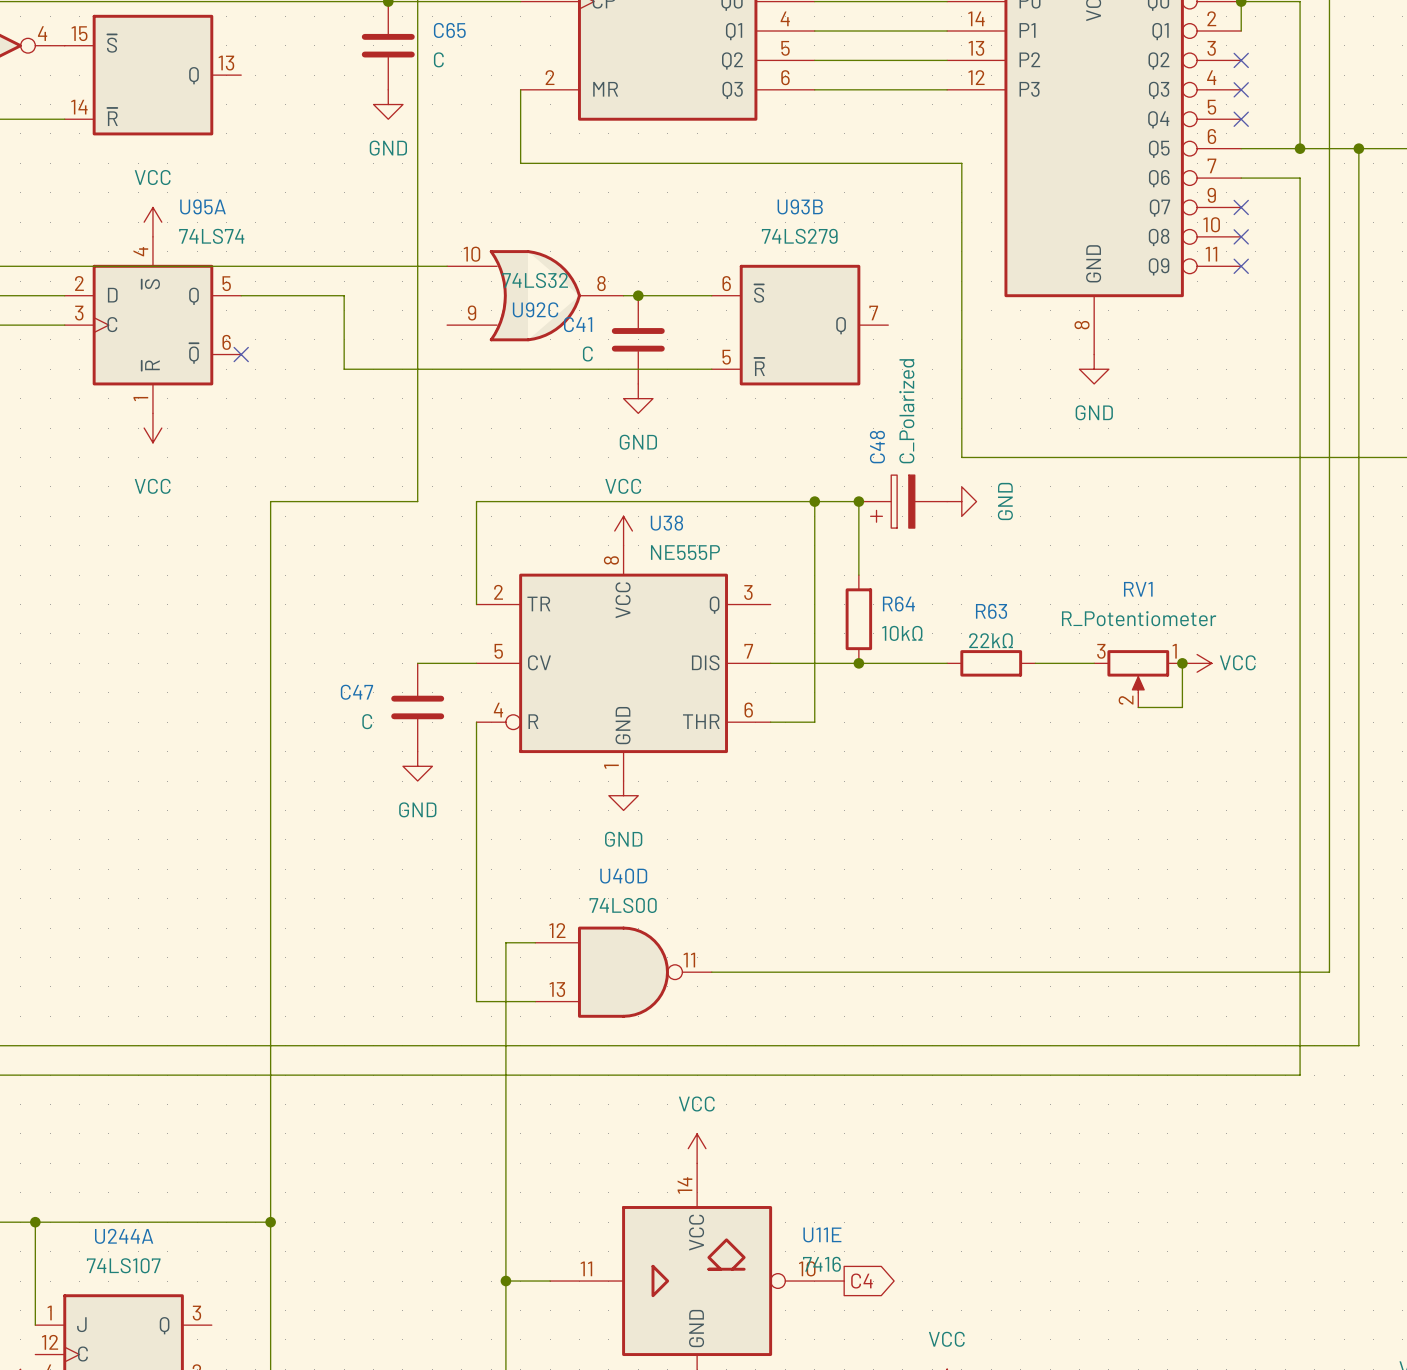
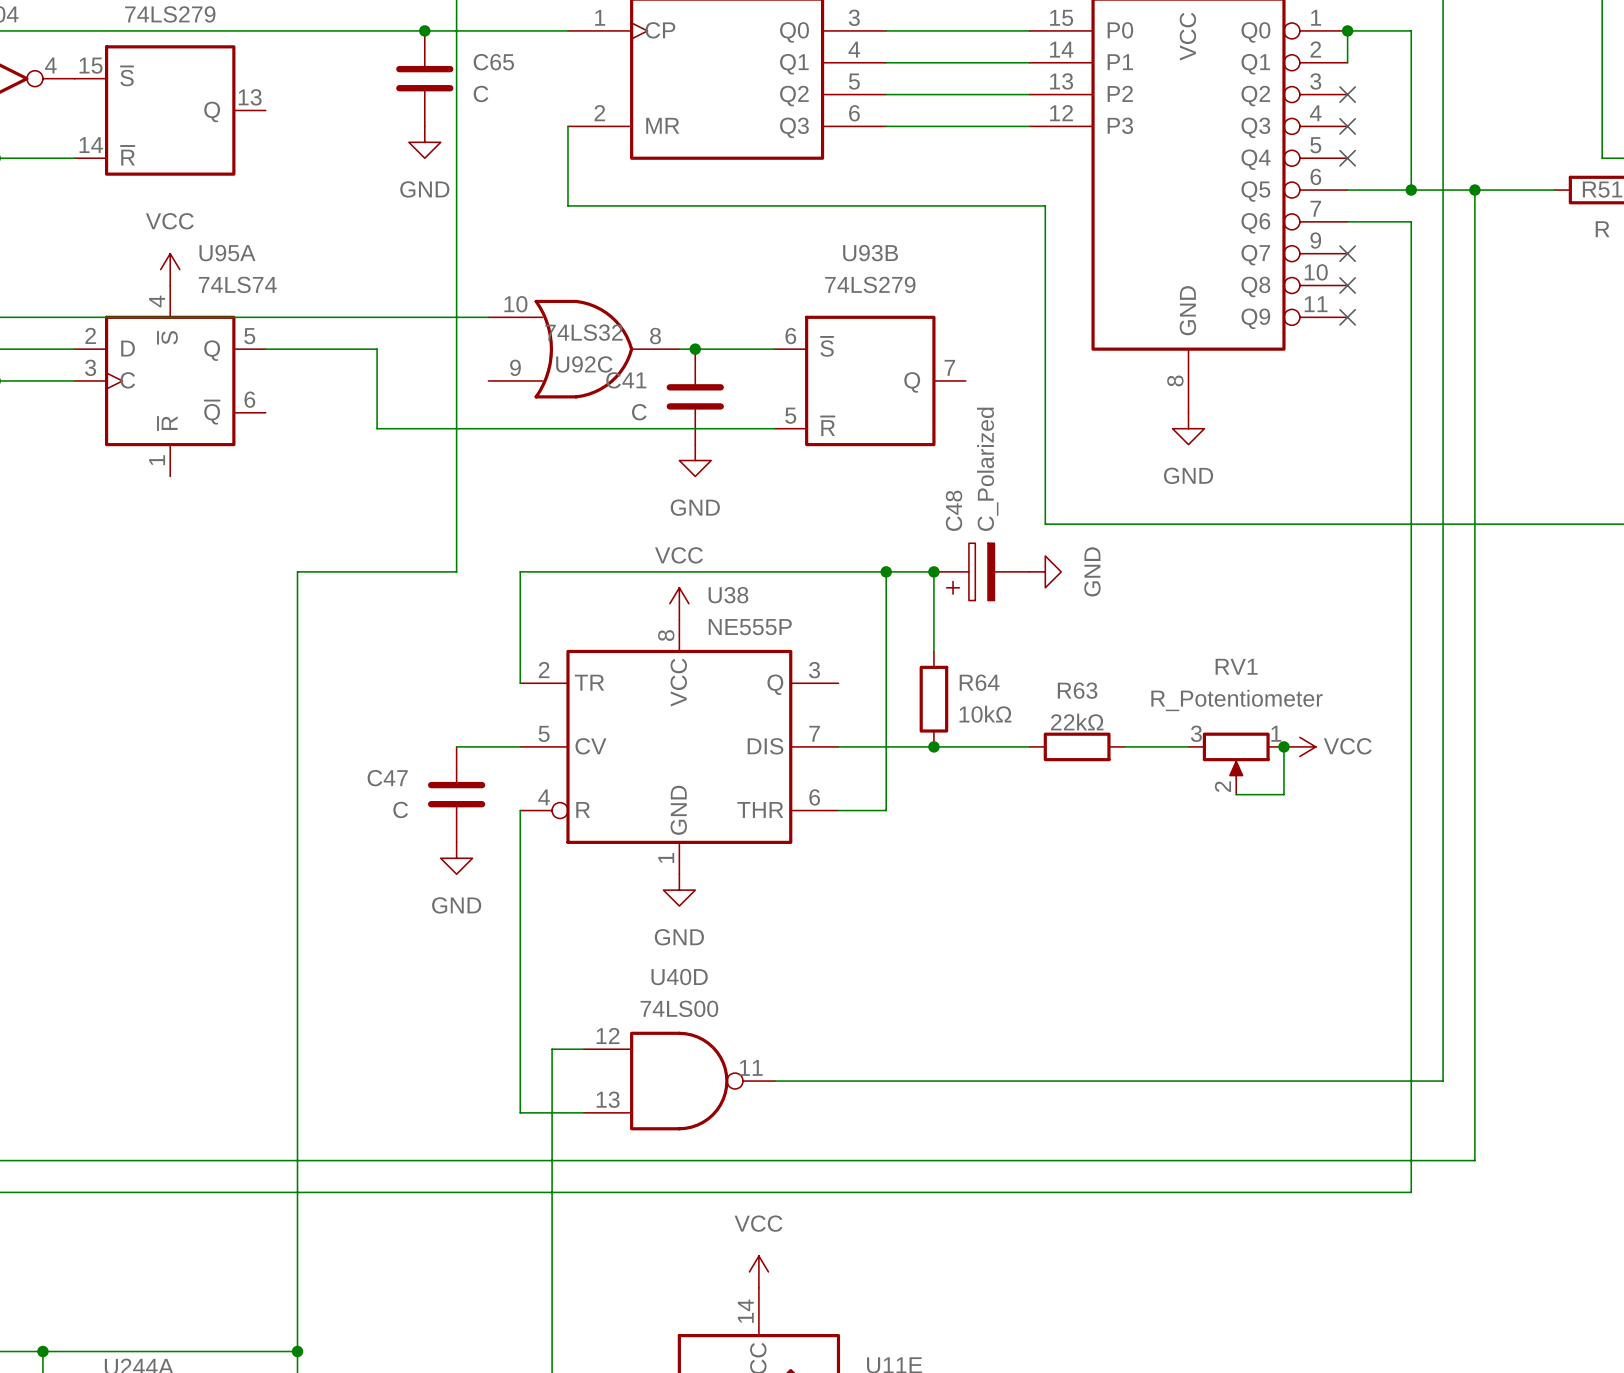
no-connect mark: (241, 354) -> none
power symbol: VCC (152, 428) -> none

